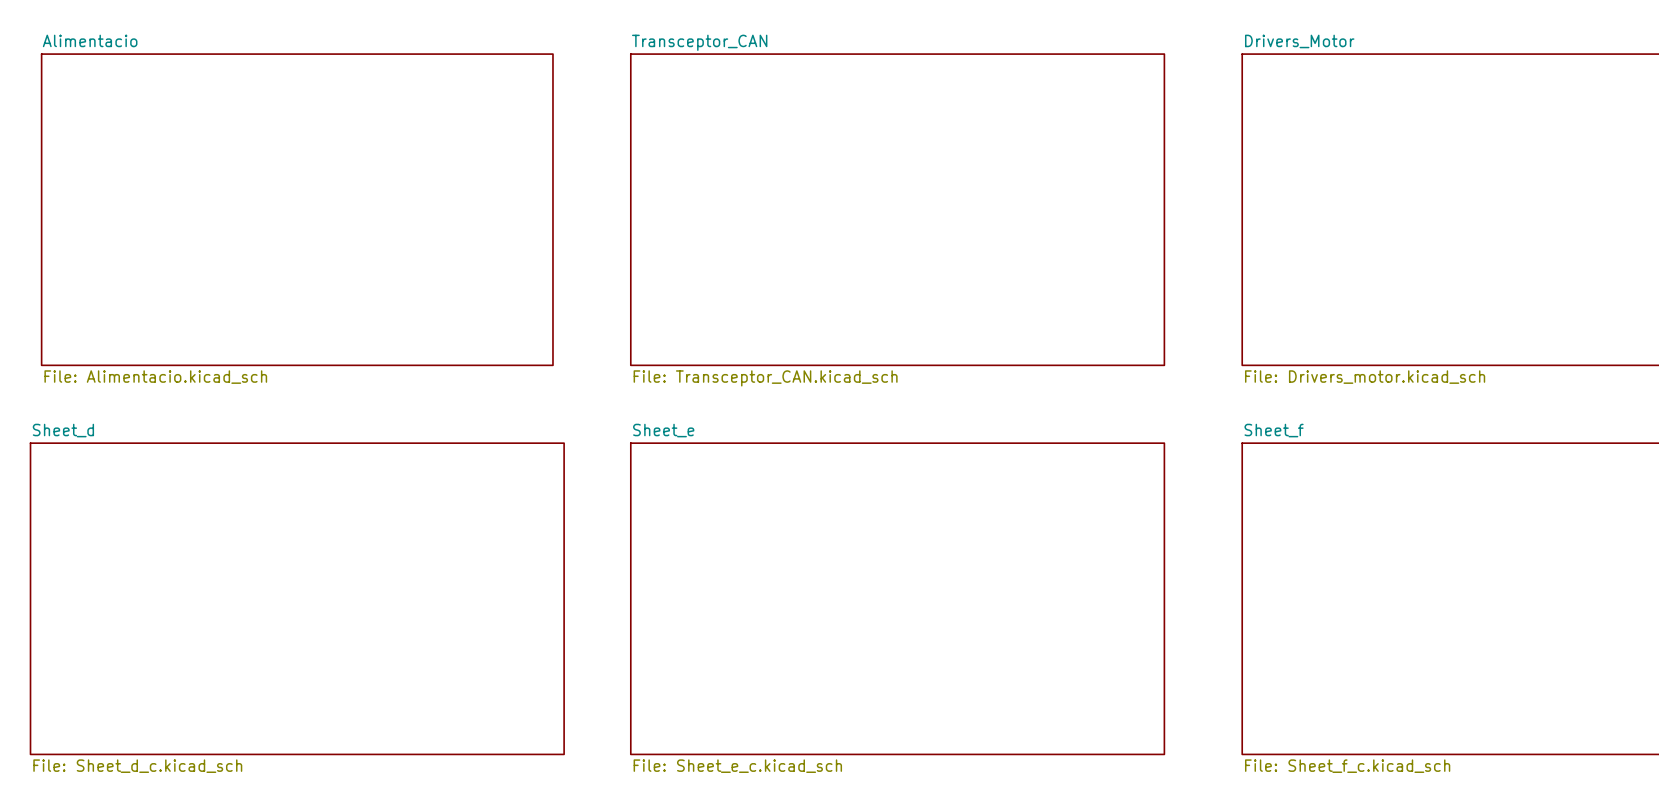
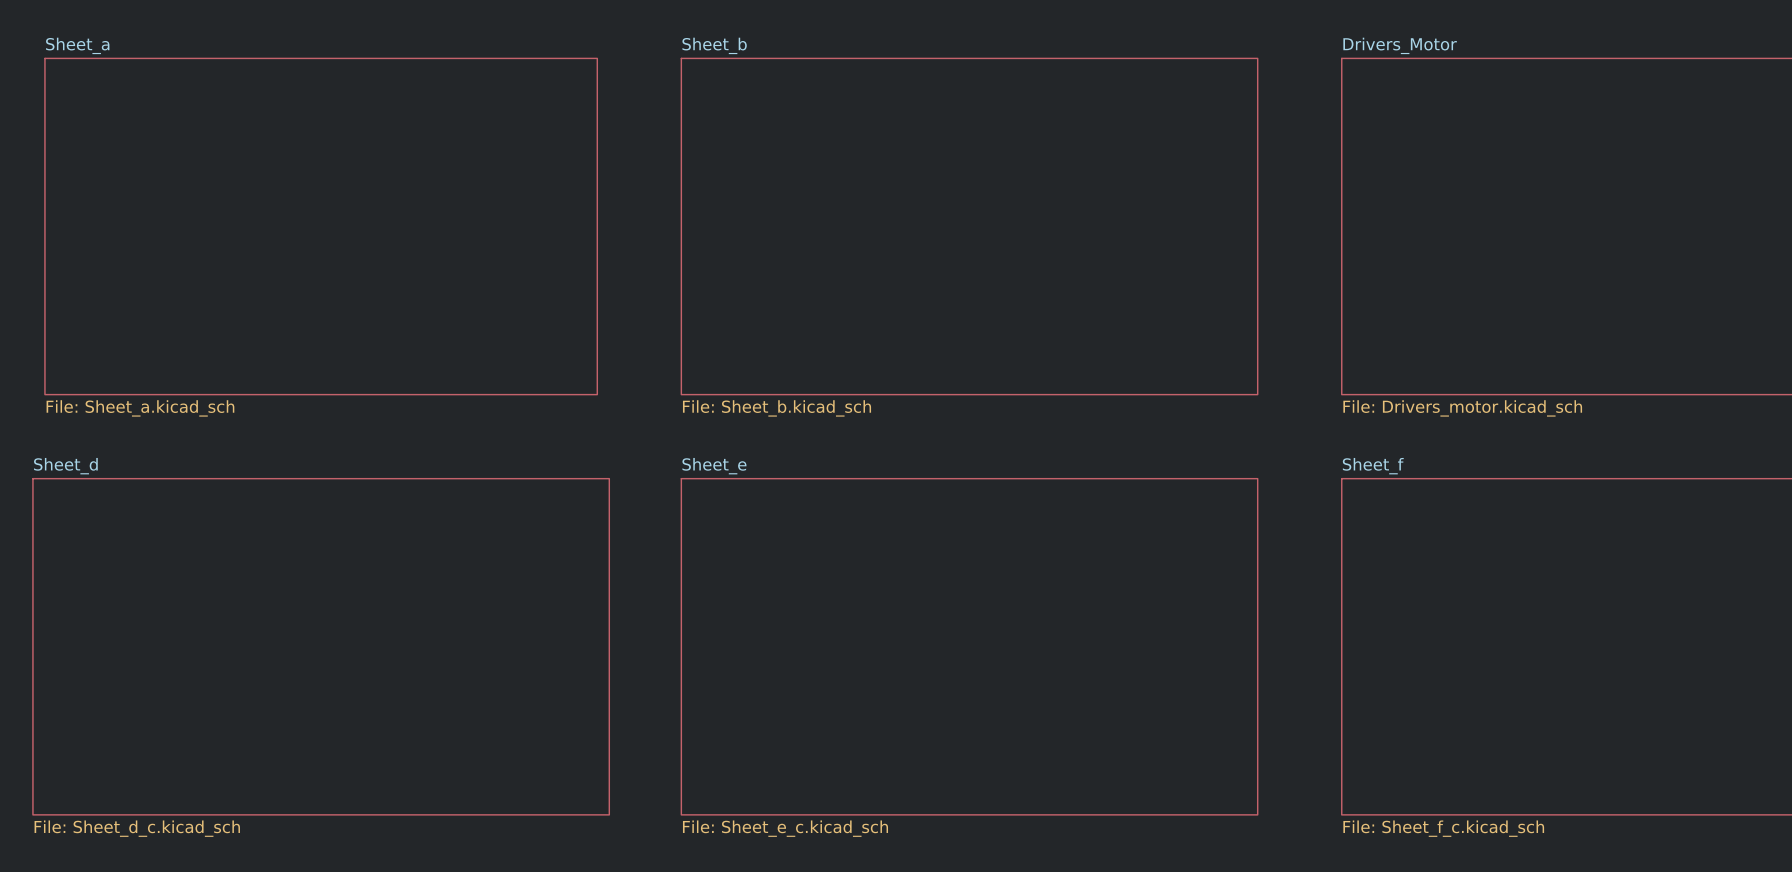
sheet Alimentacio name: Alimentacio (90, 40) -> Sheet_a (77, 45)
sheet Transceptor_CAN name: Transceptor_CAN (699, 42) -> Sheet_b (714, 45)
sheet Alimentacio value: File: Alimentacio.kicad_sch (155, 377) -> File: Sheet_a.kicad_sch (140, 408)
sheet Transceptor_CAN value: File: Transceptor_CAN.kicad_sch (765, 378) -> File: Sheet_b.kicad_sch (777, 408)

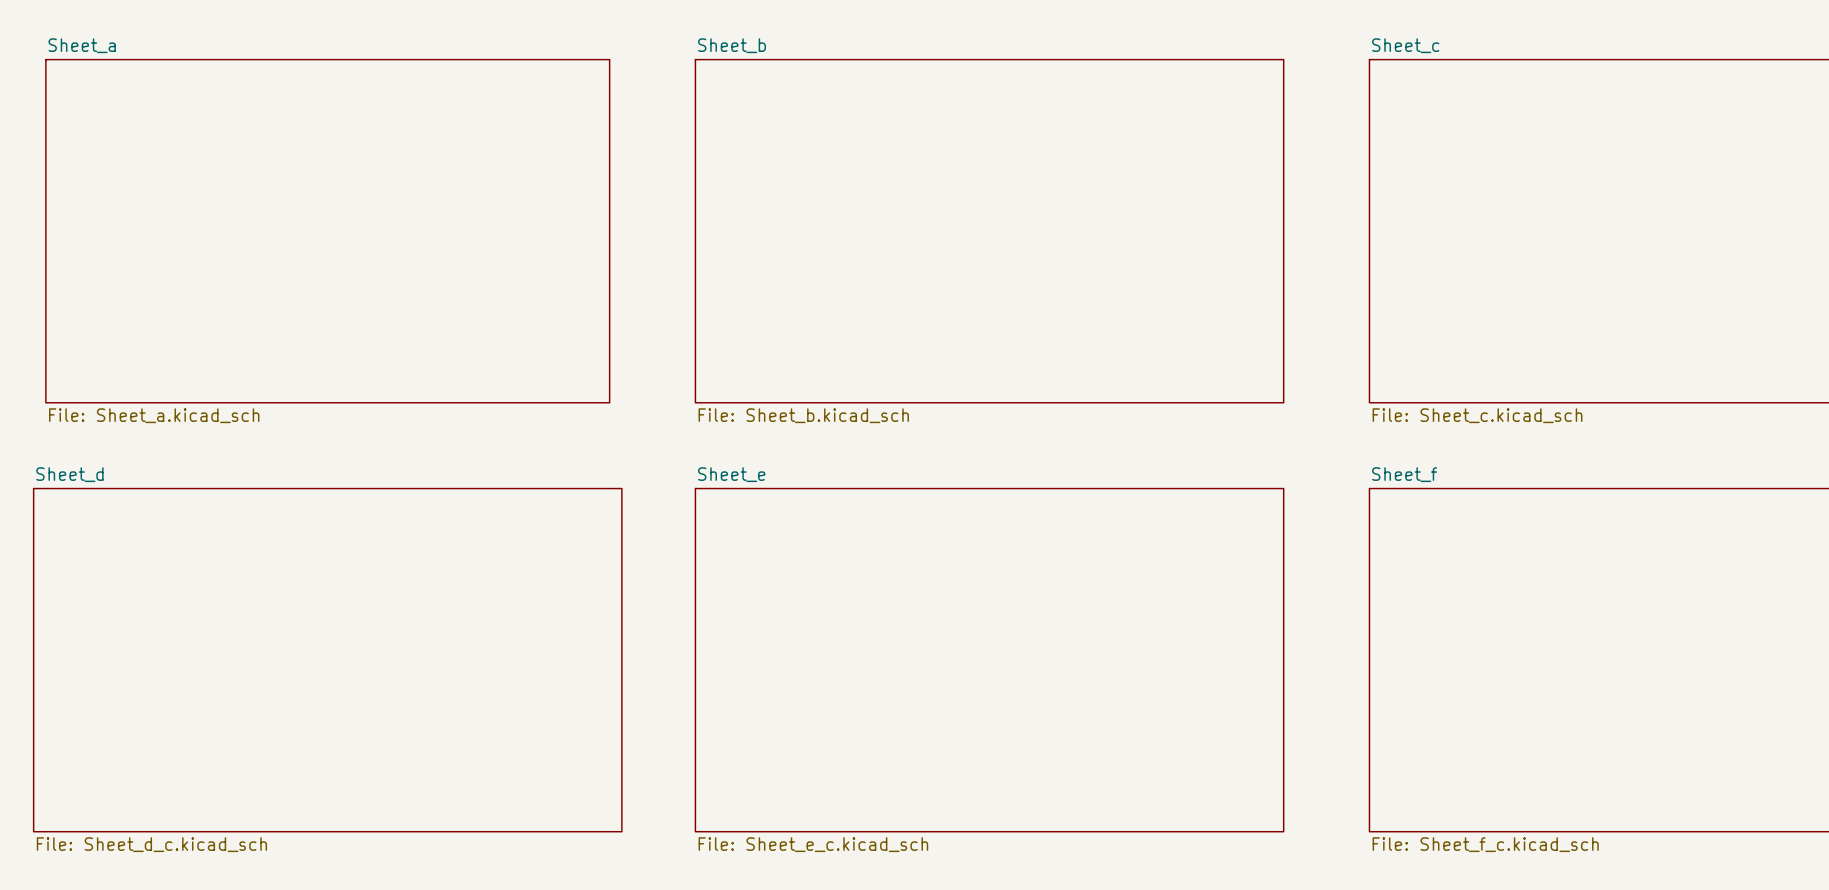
sheet Drivers_Motor name: Drivers_Motor (1400, 45) -> Sheet_c (1405, 45)
sheet Drivers_Motor value: File: Drivers_motor.kicad_sch (1462, 408) -> File: Sheet_c.kicad_sch (1477, 415)

